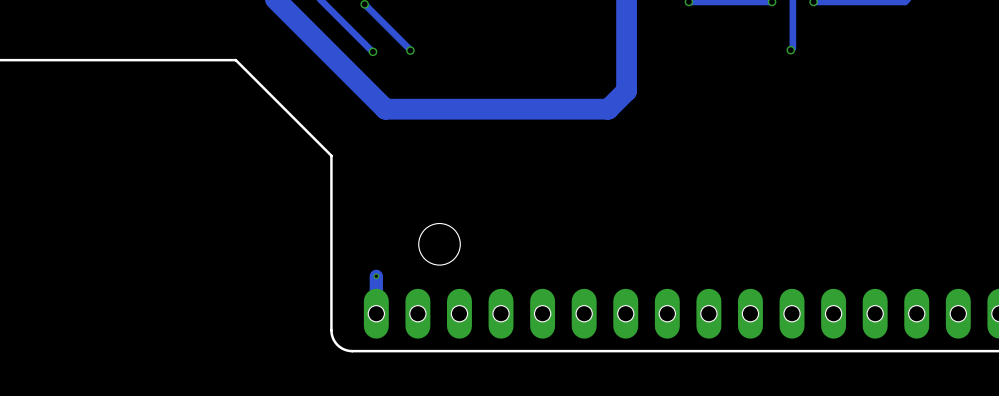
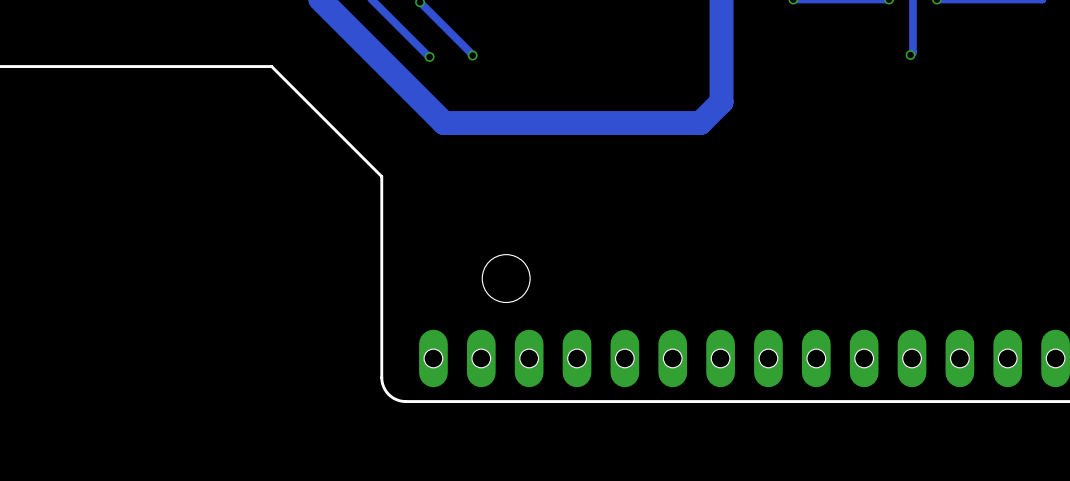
track: (376, 276) (376, 302) -> none
via: (376, 276) -> none

